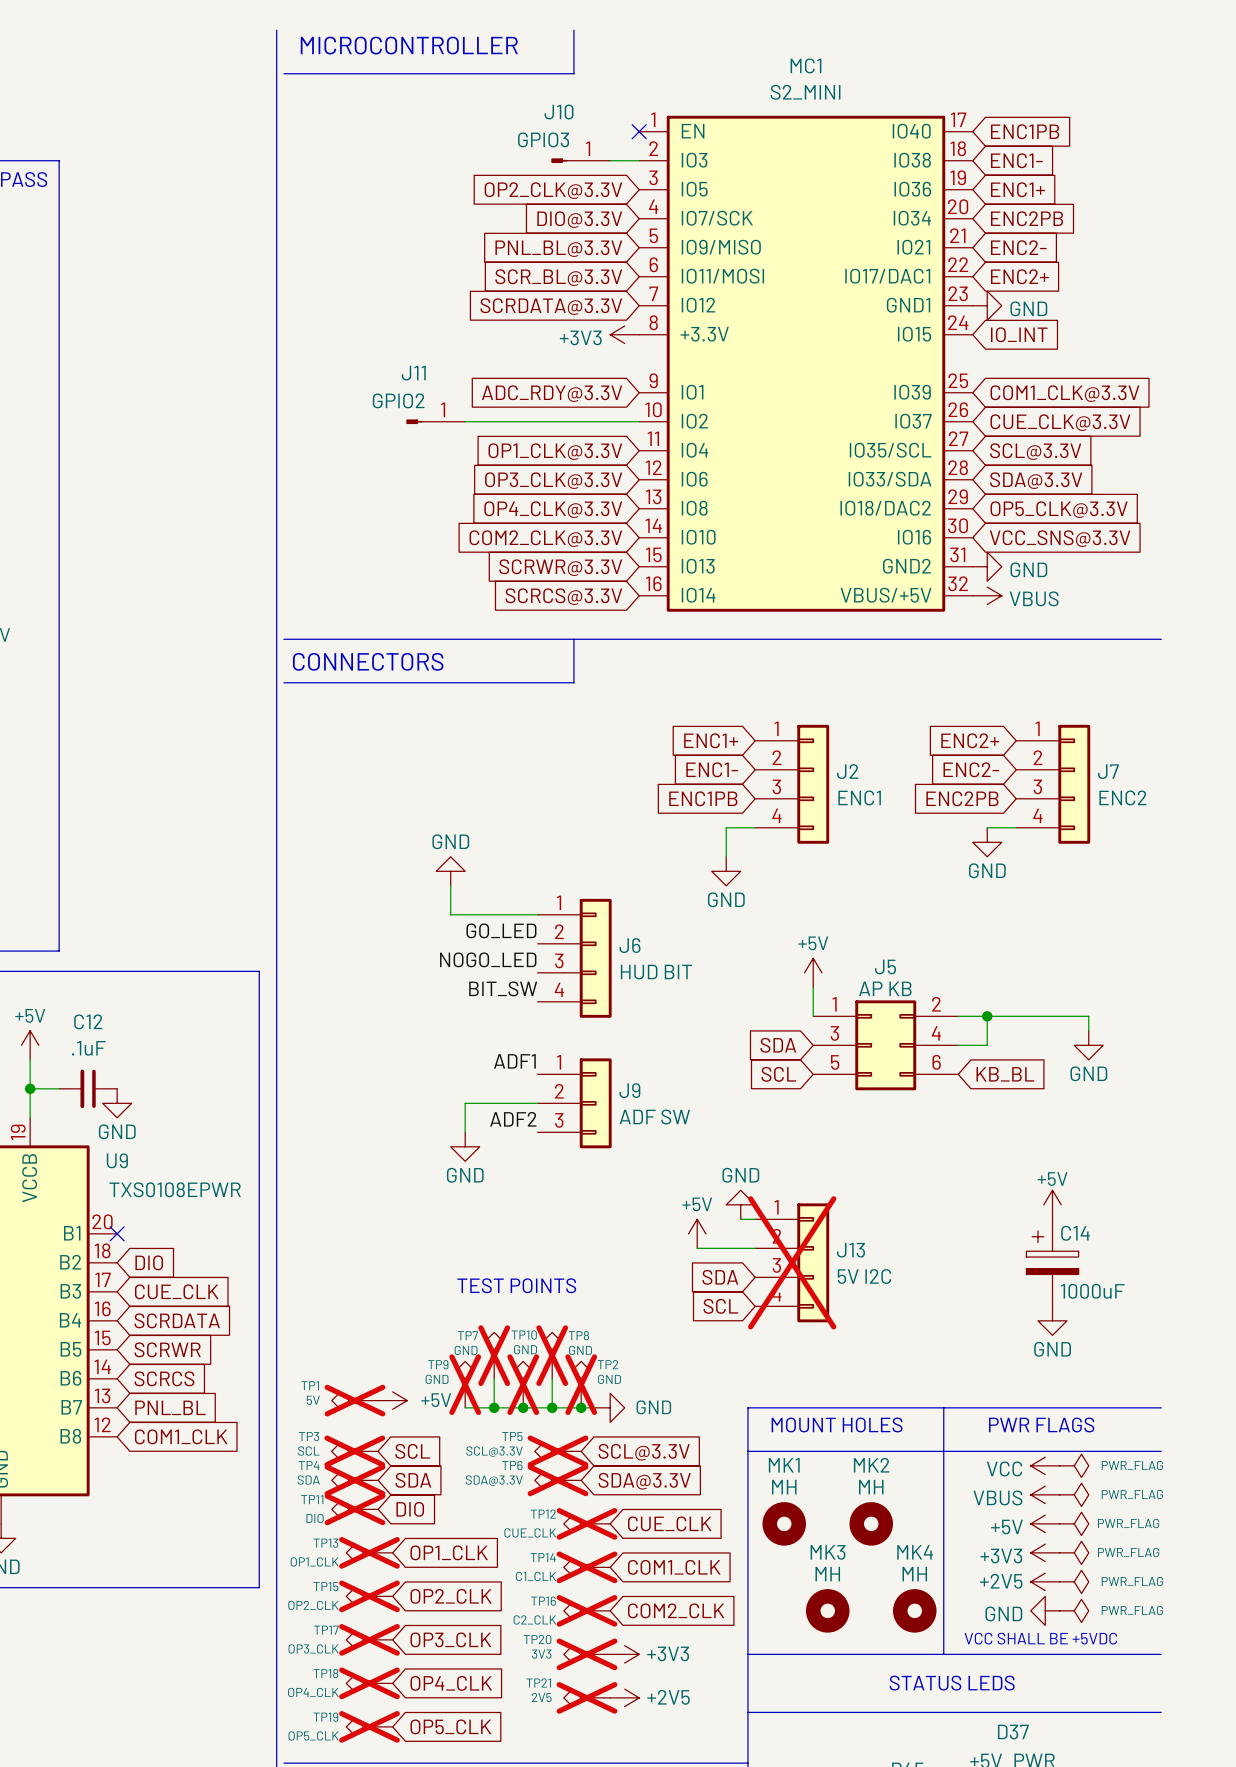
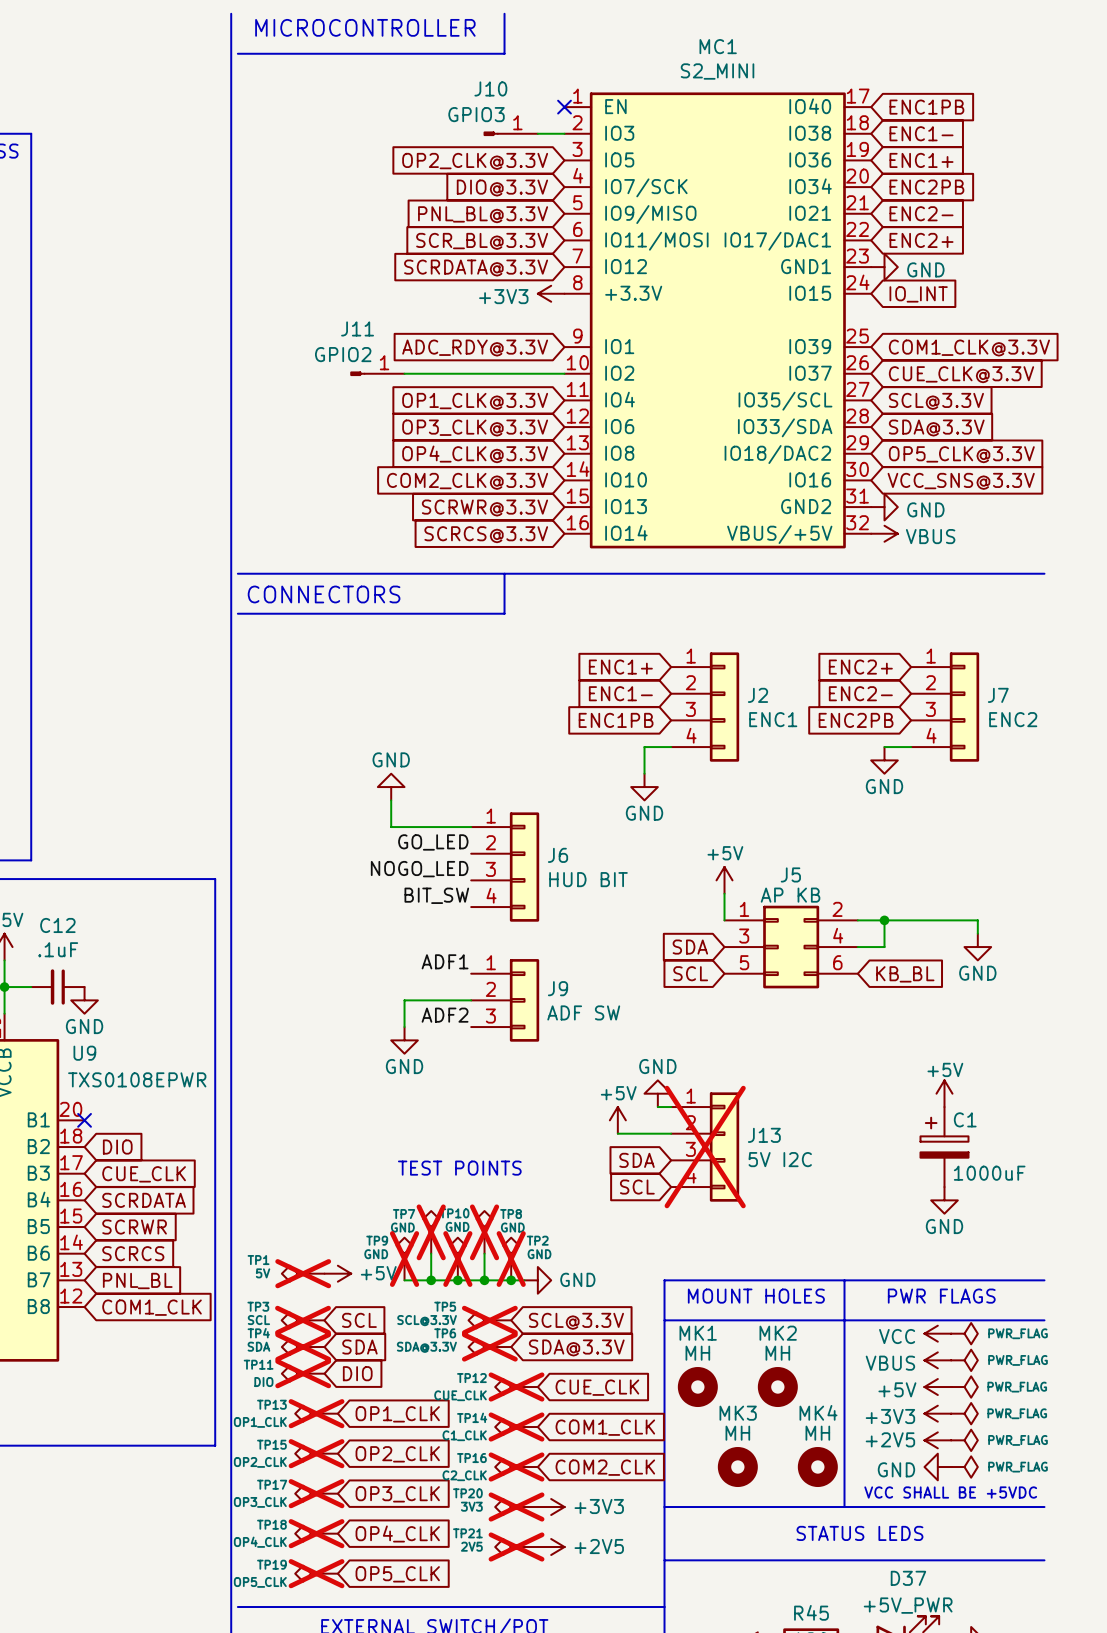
C14 name: C14 (1075, 1233) -> C1 (965, 1119)

